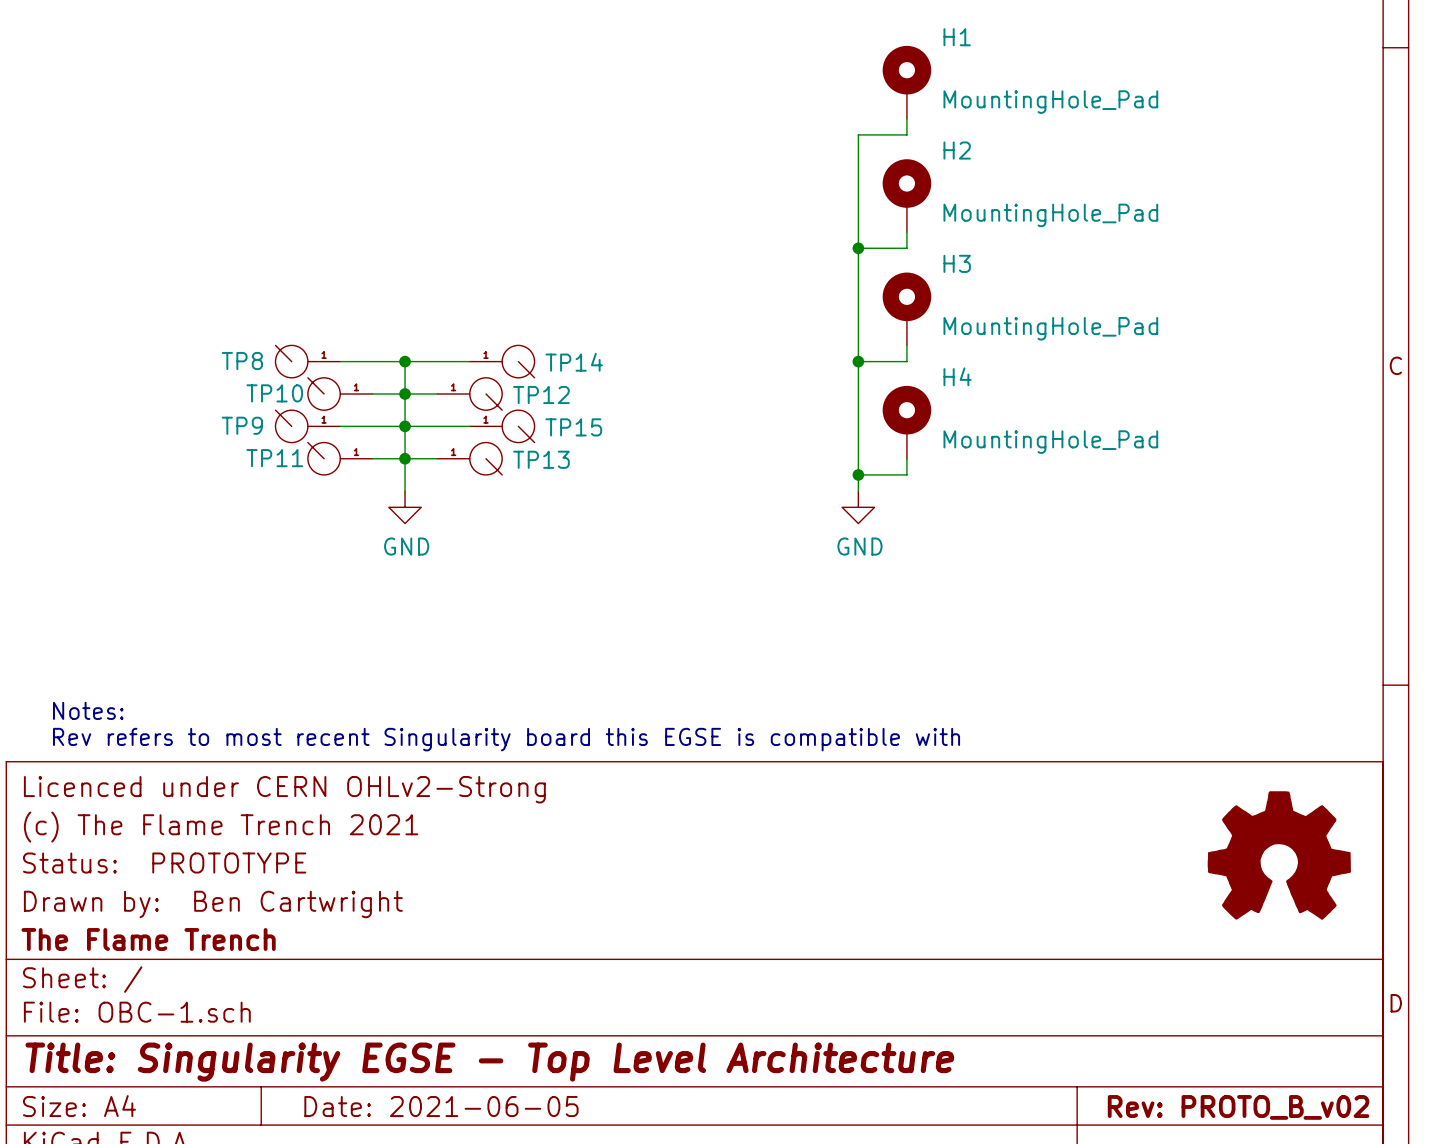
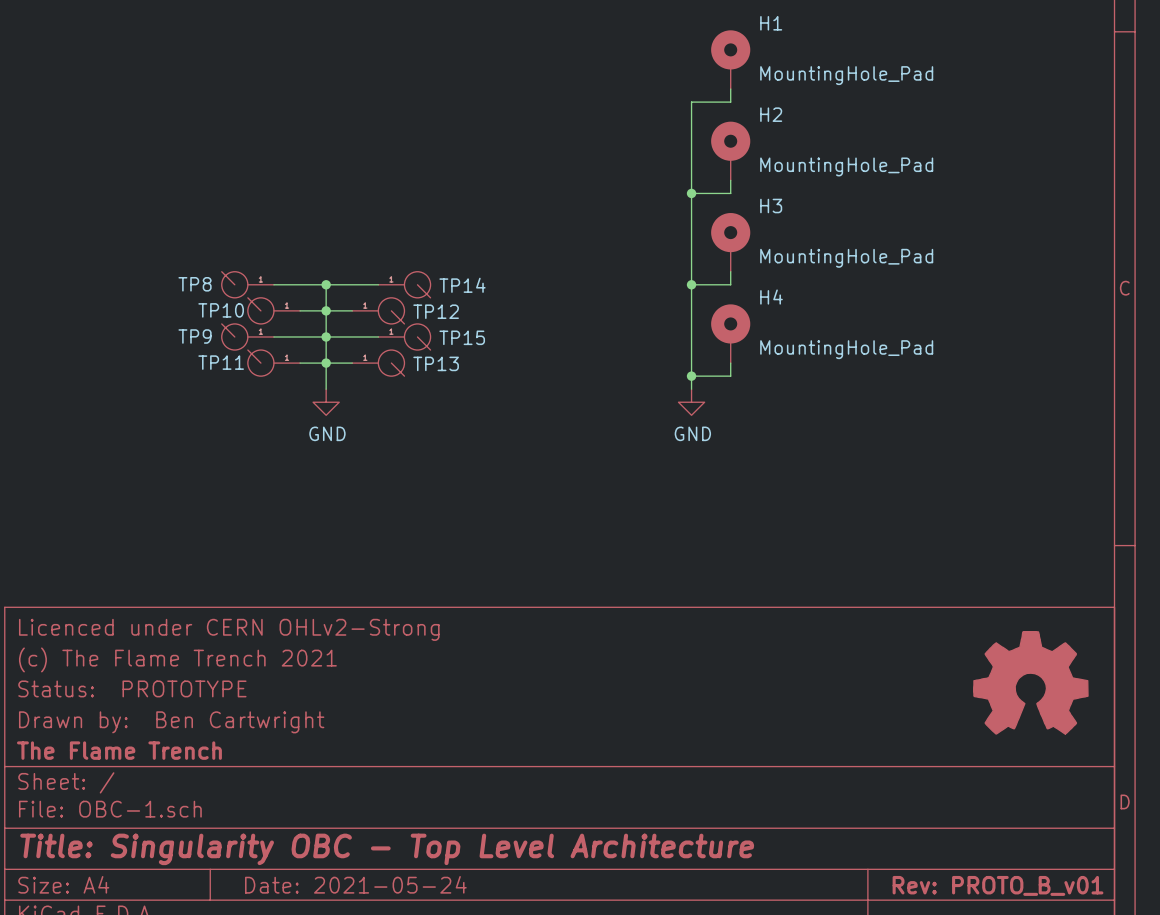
text: Notes: (88, 710) -> none
text: Rev refers to most recent Singularity board this EGSE is compatible with (506, 739) -> none
title block: Title: Singularity EGSE - Top Level Architecture (489, 1062) -> Title: Singularity OBC - Top Level Architecture (387, 849)
title block: Date: 2021-06-05 (441, 1106) -> Date: 2021-05-24 (355, 884)
title block: Rev: PROTO_B_v02 (1238, 1107) -> Rev: PROTO_B_v01 (998, 885)

